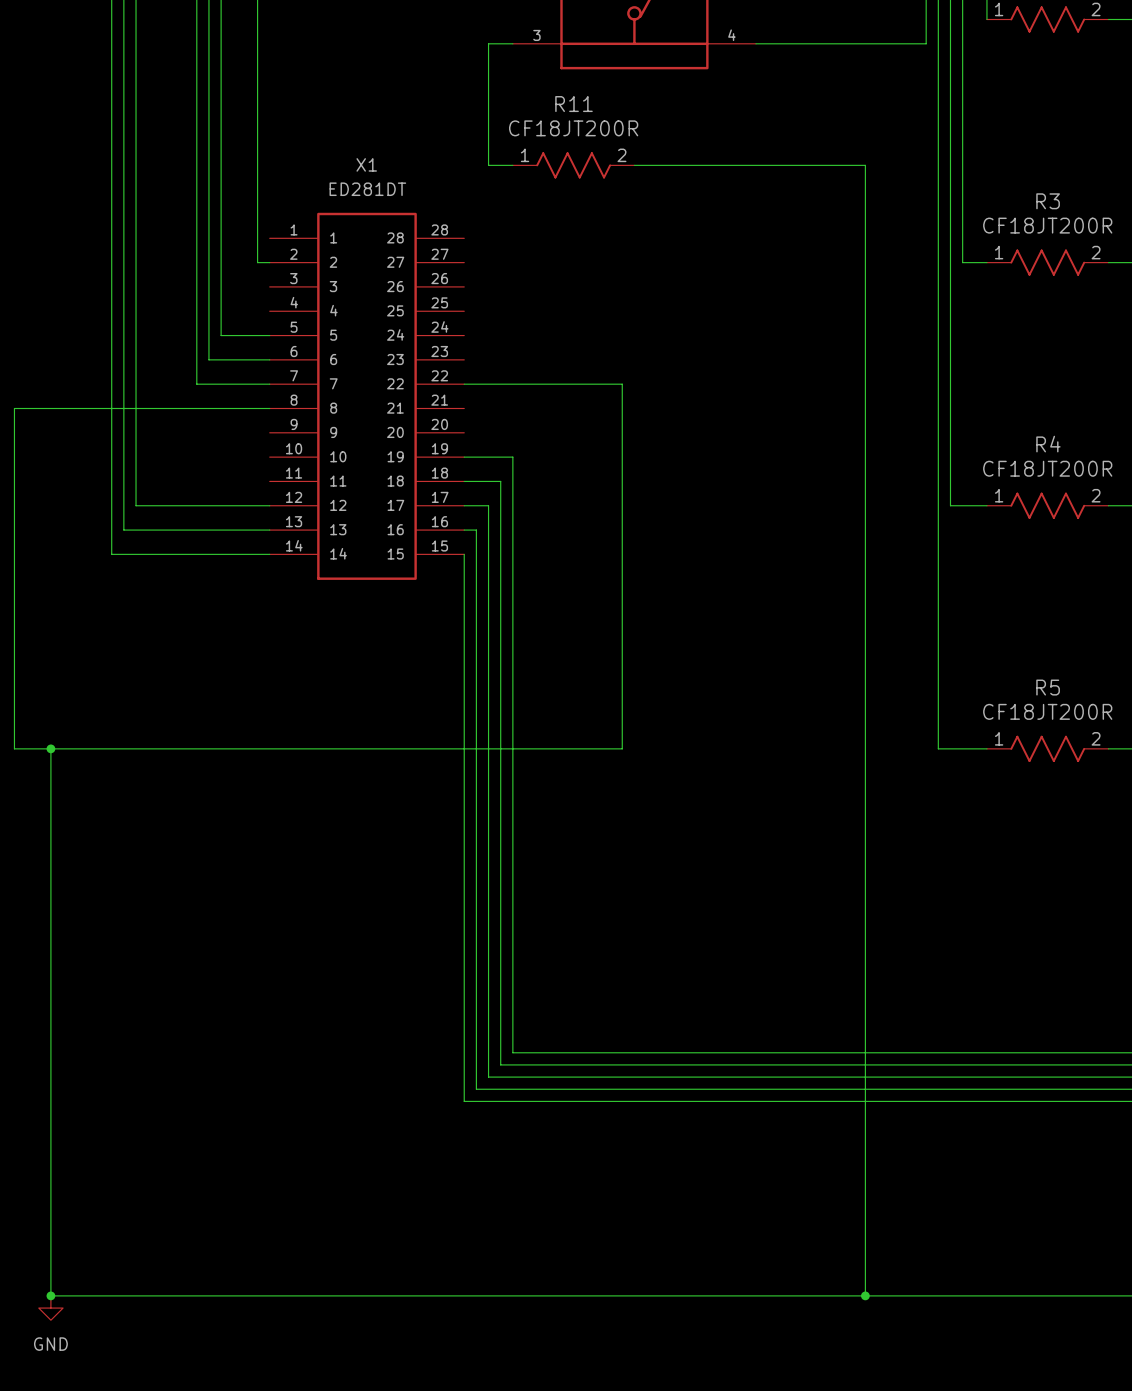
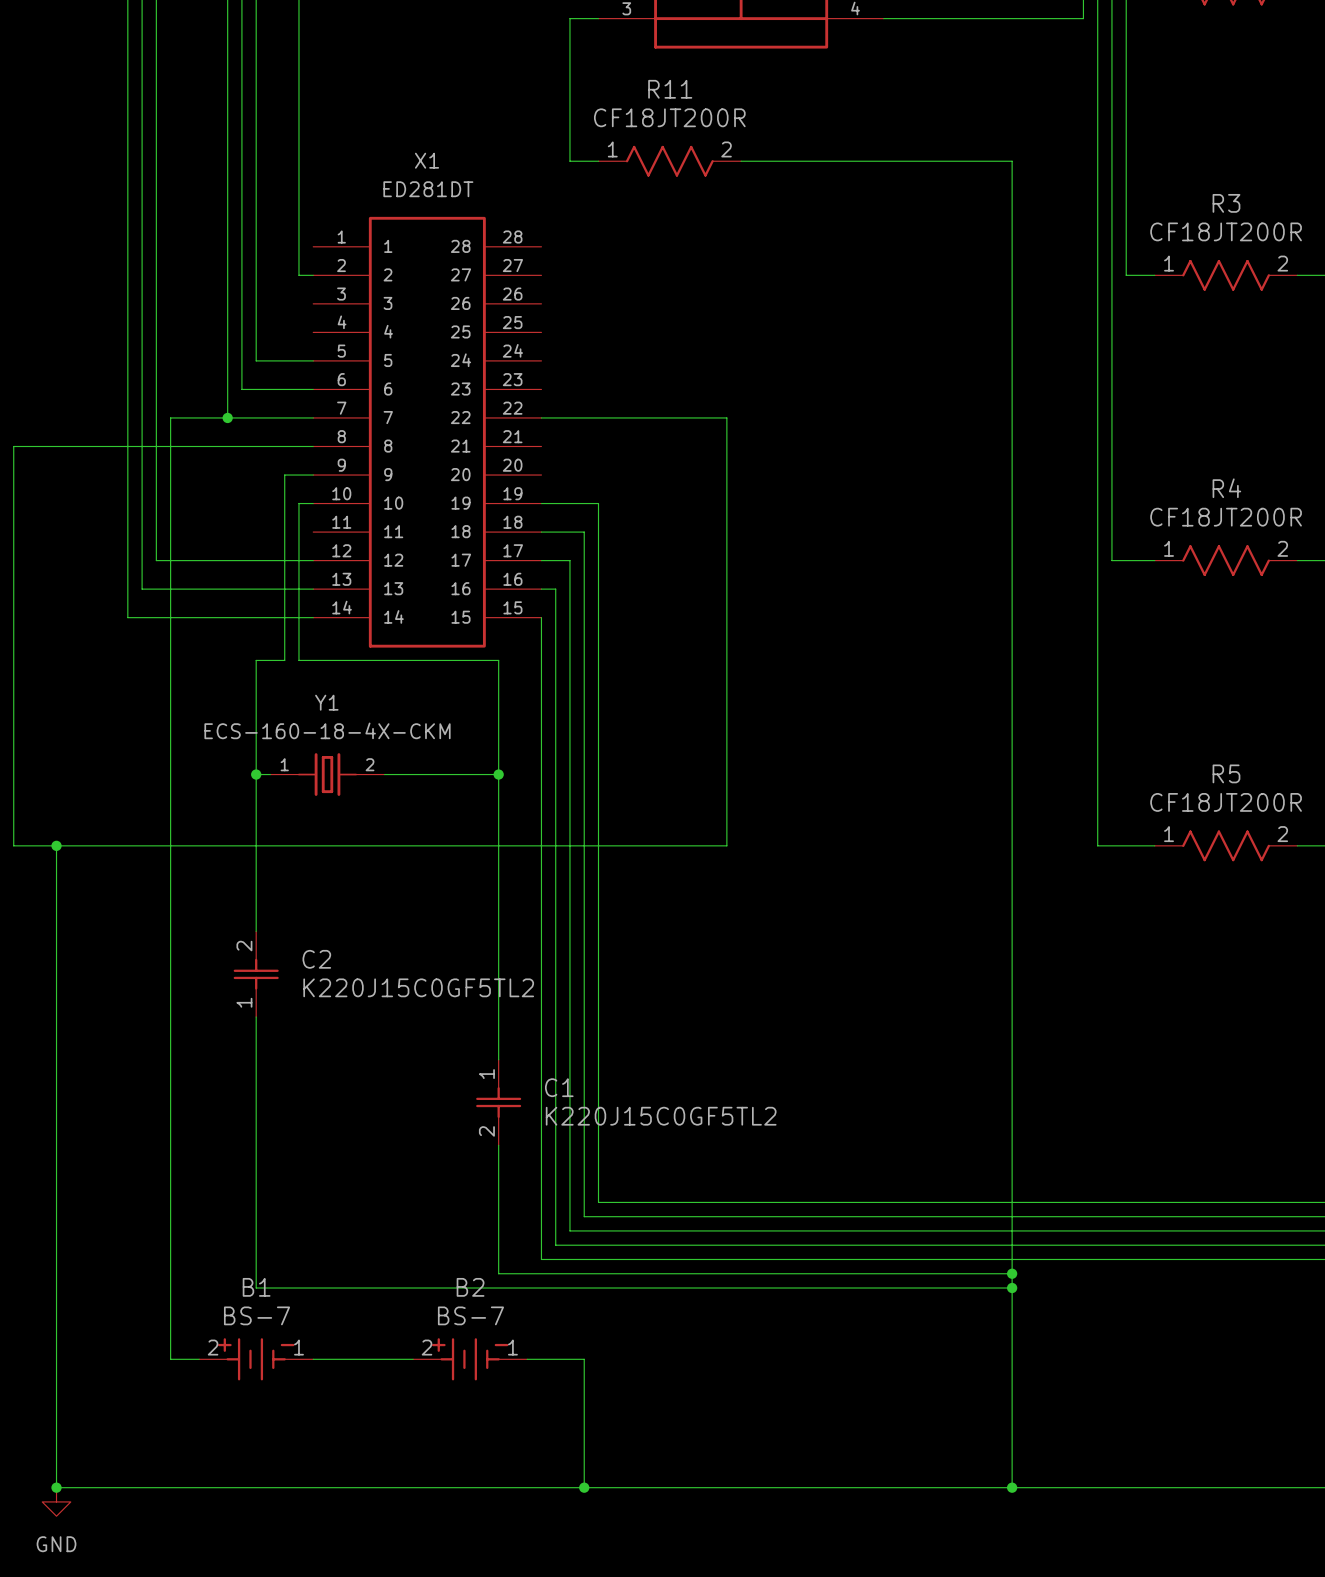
wire: none -> (227, 417) (170, 417) (170, 1359) (199, 1359)
junction: none -> (227, 417)
wire: none -> (313, 475) (284, 475) (284, 660) (256, 660) (256, 931)
wire: none -> (313, 503) (298, 503) (298, 660) (498, 660) (498, 1059)
wire: none -> (256, 774) (270, 774)
junction: none -> (256, 774)
Y1: none -> ECS-160-18-4X-CKM (327, 774)
wire: none -> (384, 774) (498, 774)
junction: none -> (498, 774)
C2: none -> K220J15C0GF5TL2 (256, 974)
wire: none -> (256, 1017) (256, 1288) (1012, 1288)
C1: none -> K220J15C0GF5TL2 (498, 1102)
wire: none -> (498, 1145) (498, 1273) (1012, 1273)
junction: none -> (1012, 1273)
junction: none -> (1012, 1288)
B1: none -> BS-7 (256, 1359)
wire: none -> (313, 1359) (413, 1359)
B2: none -> BS-7 (470, 1359)
wire: none -> (527, 1359) (584, 1359) (584, 1487)
junction: none -> (584, 1487)

